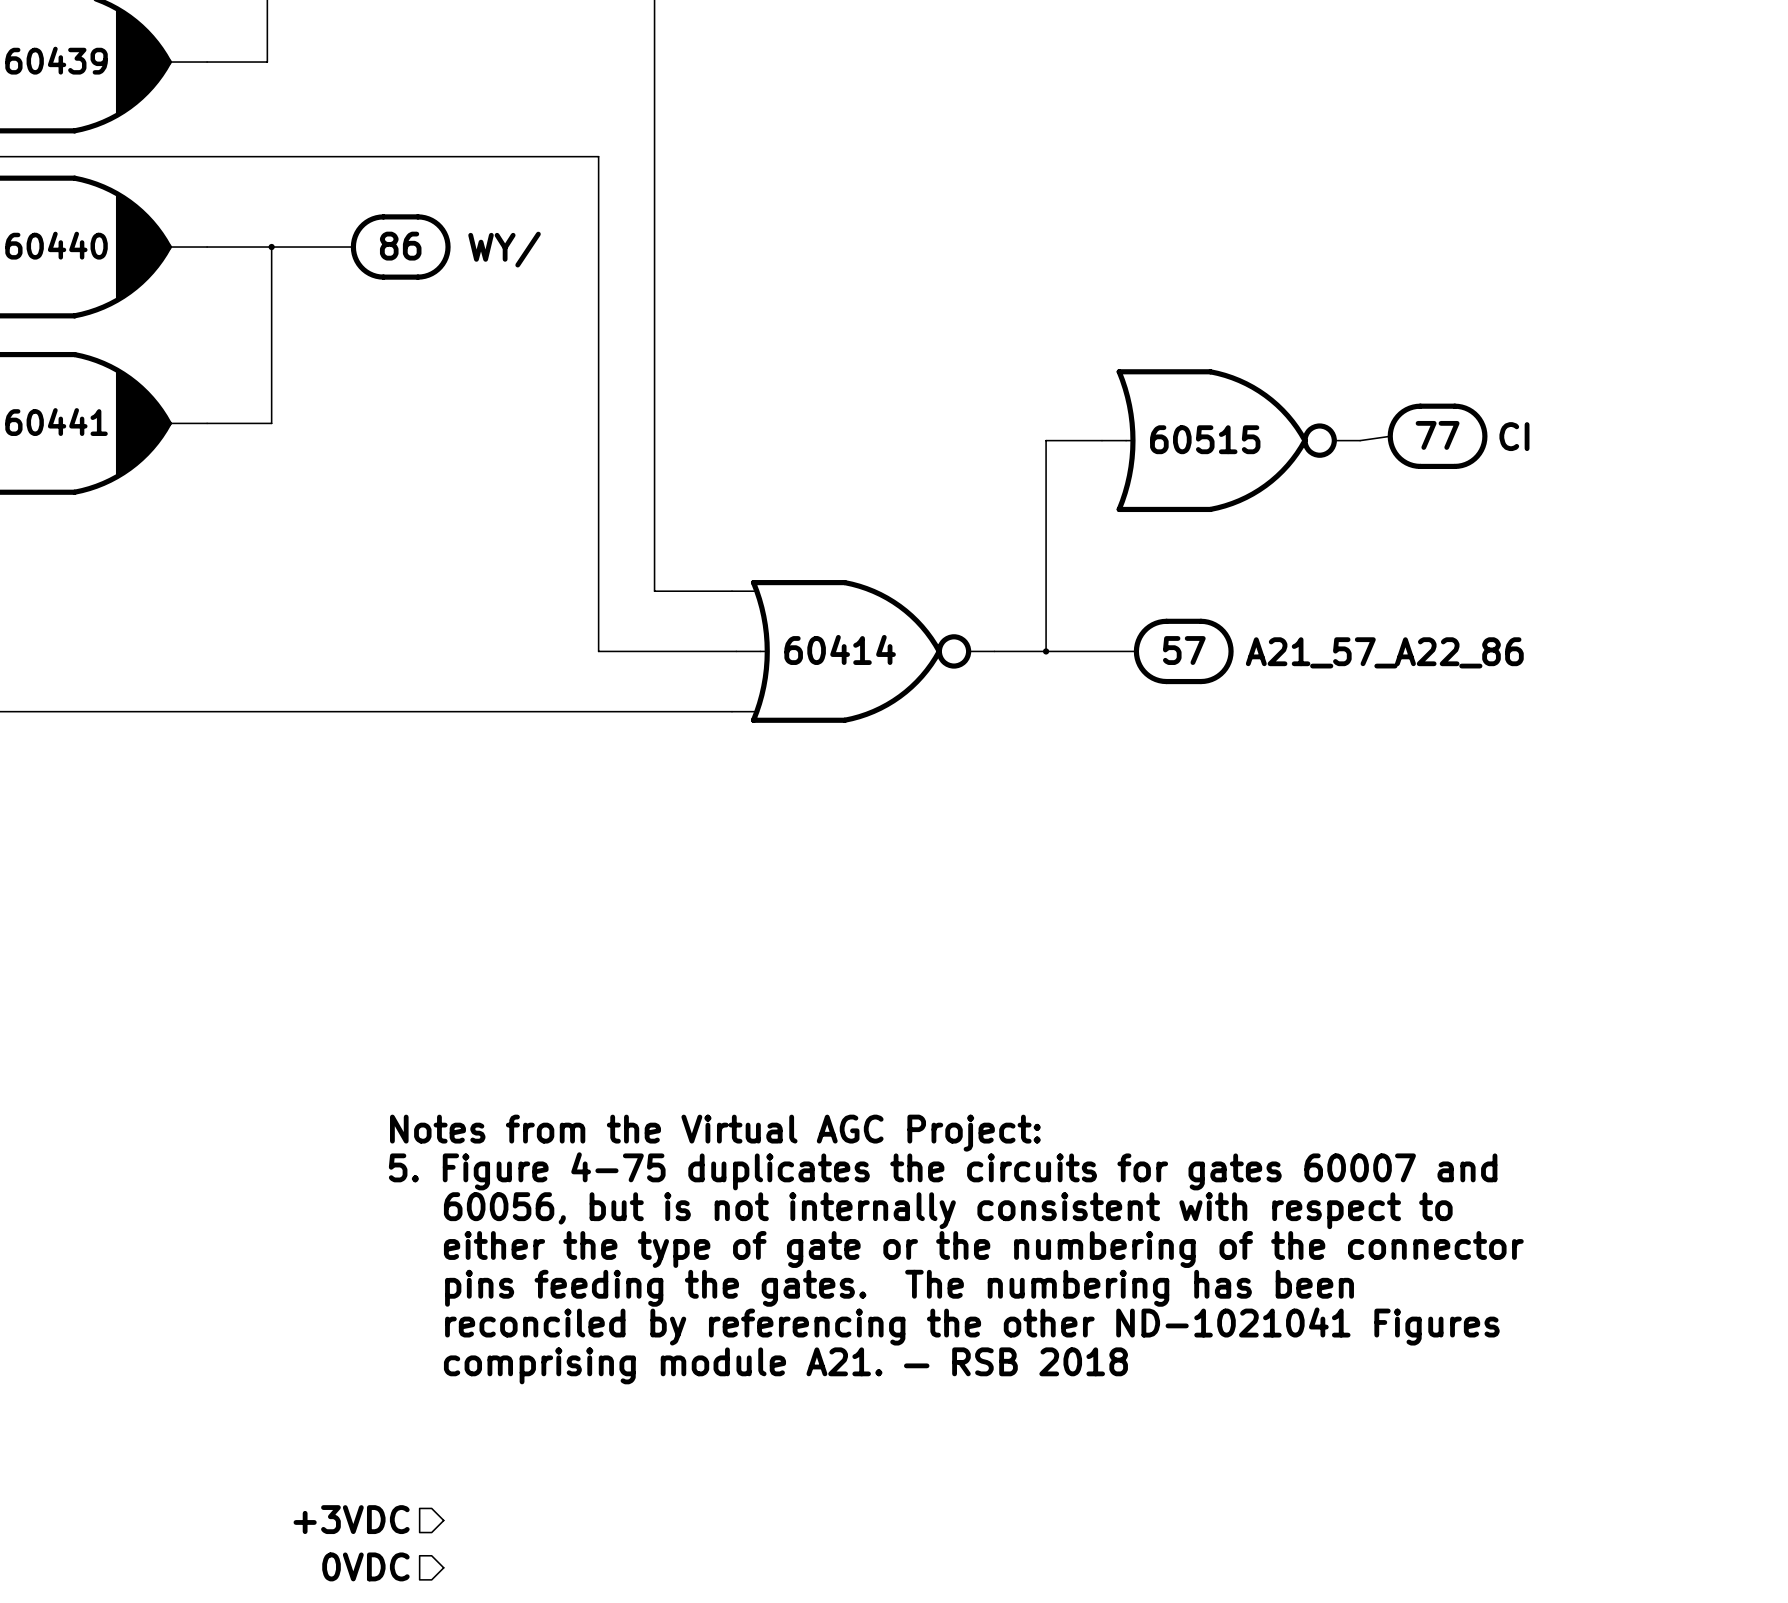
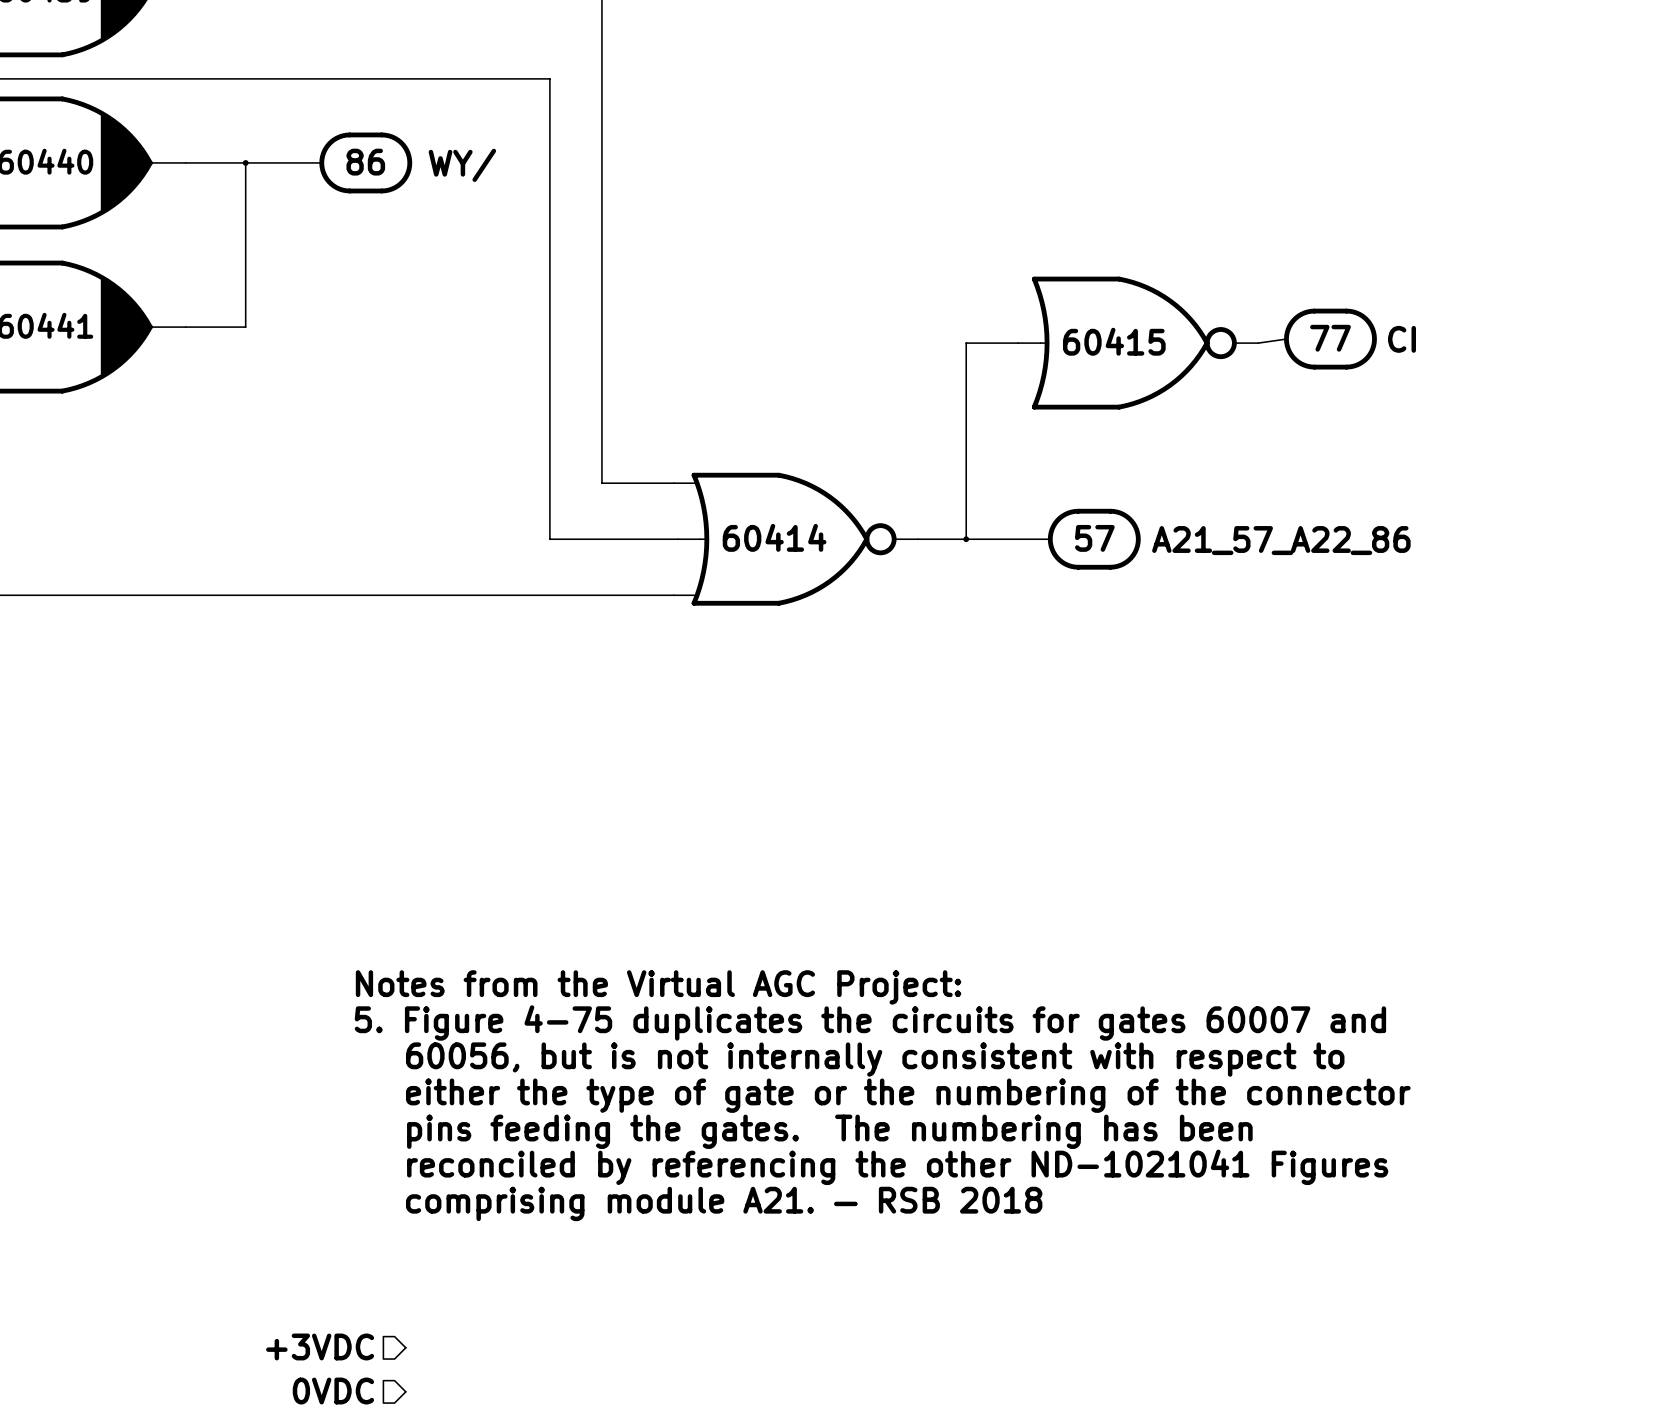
part text: 60515 (1205, 439) -> 60415 (1114, 341)

